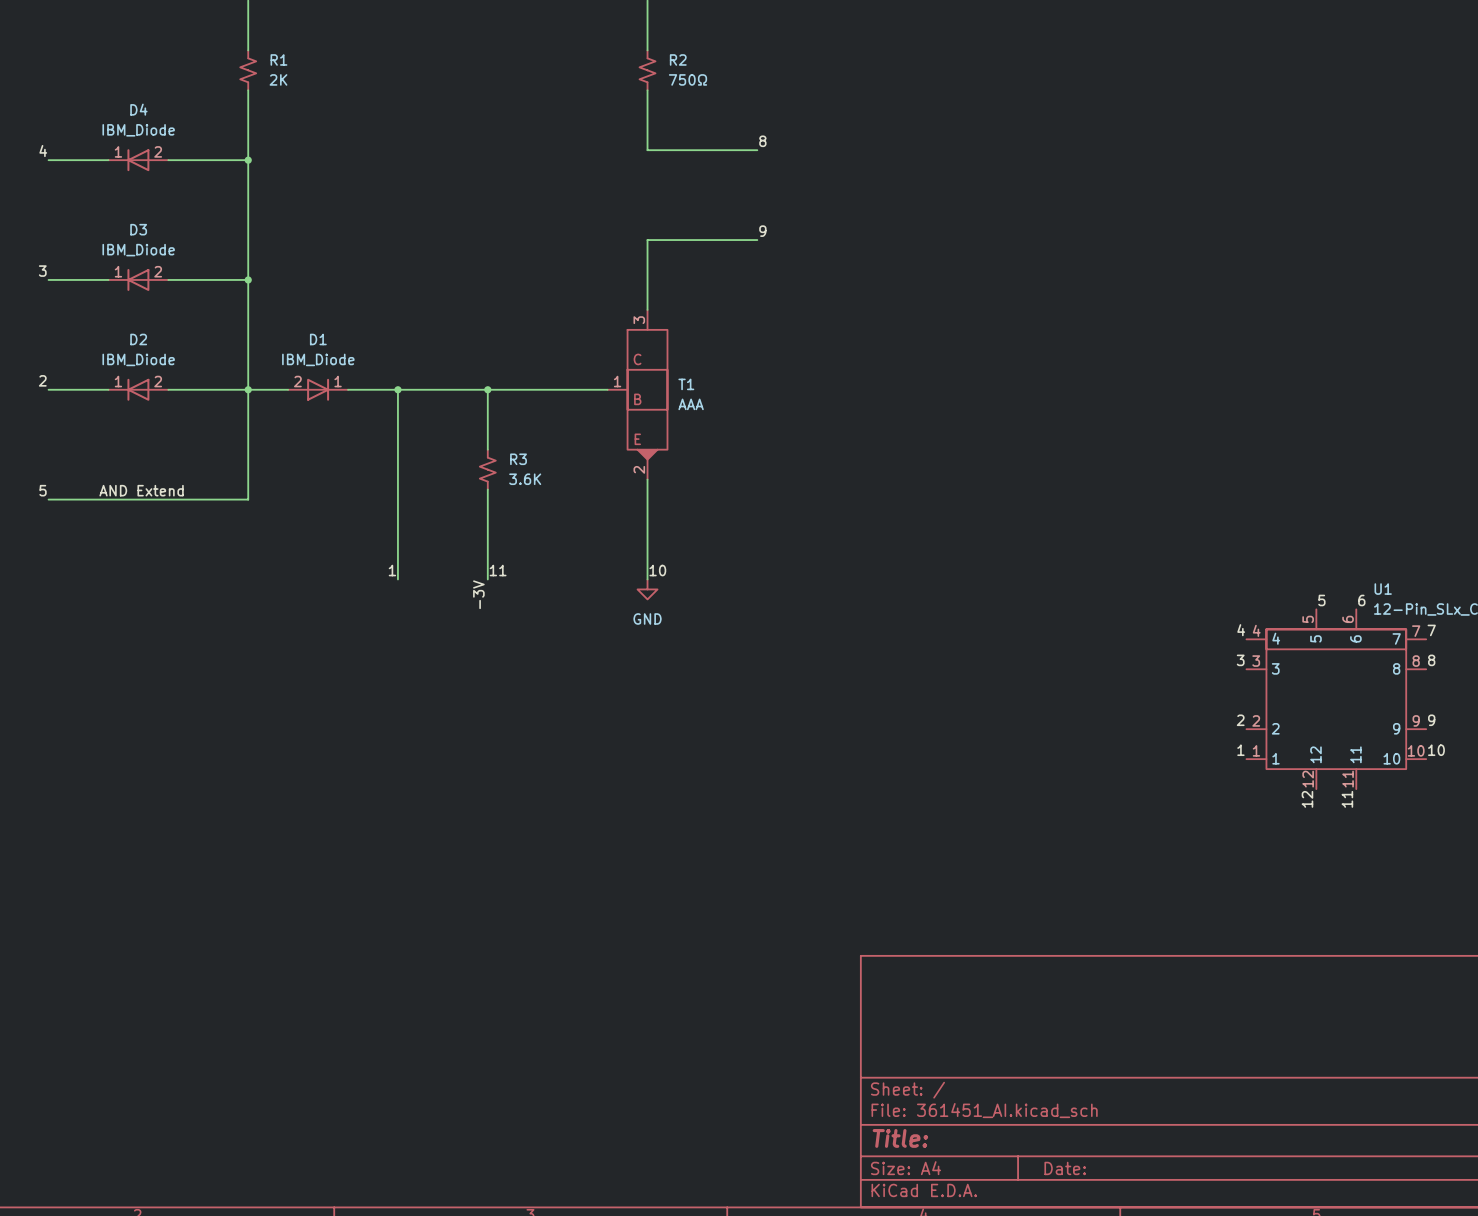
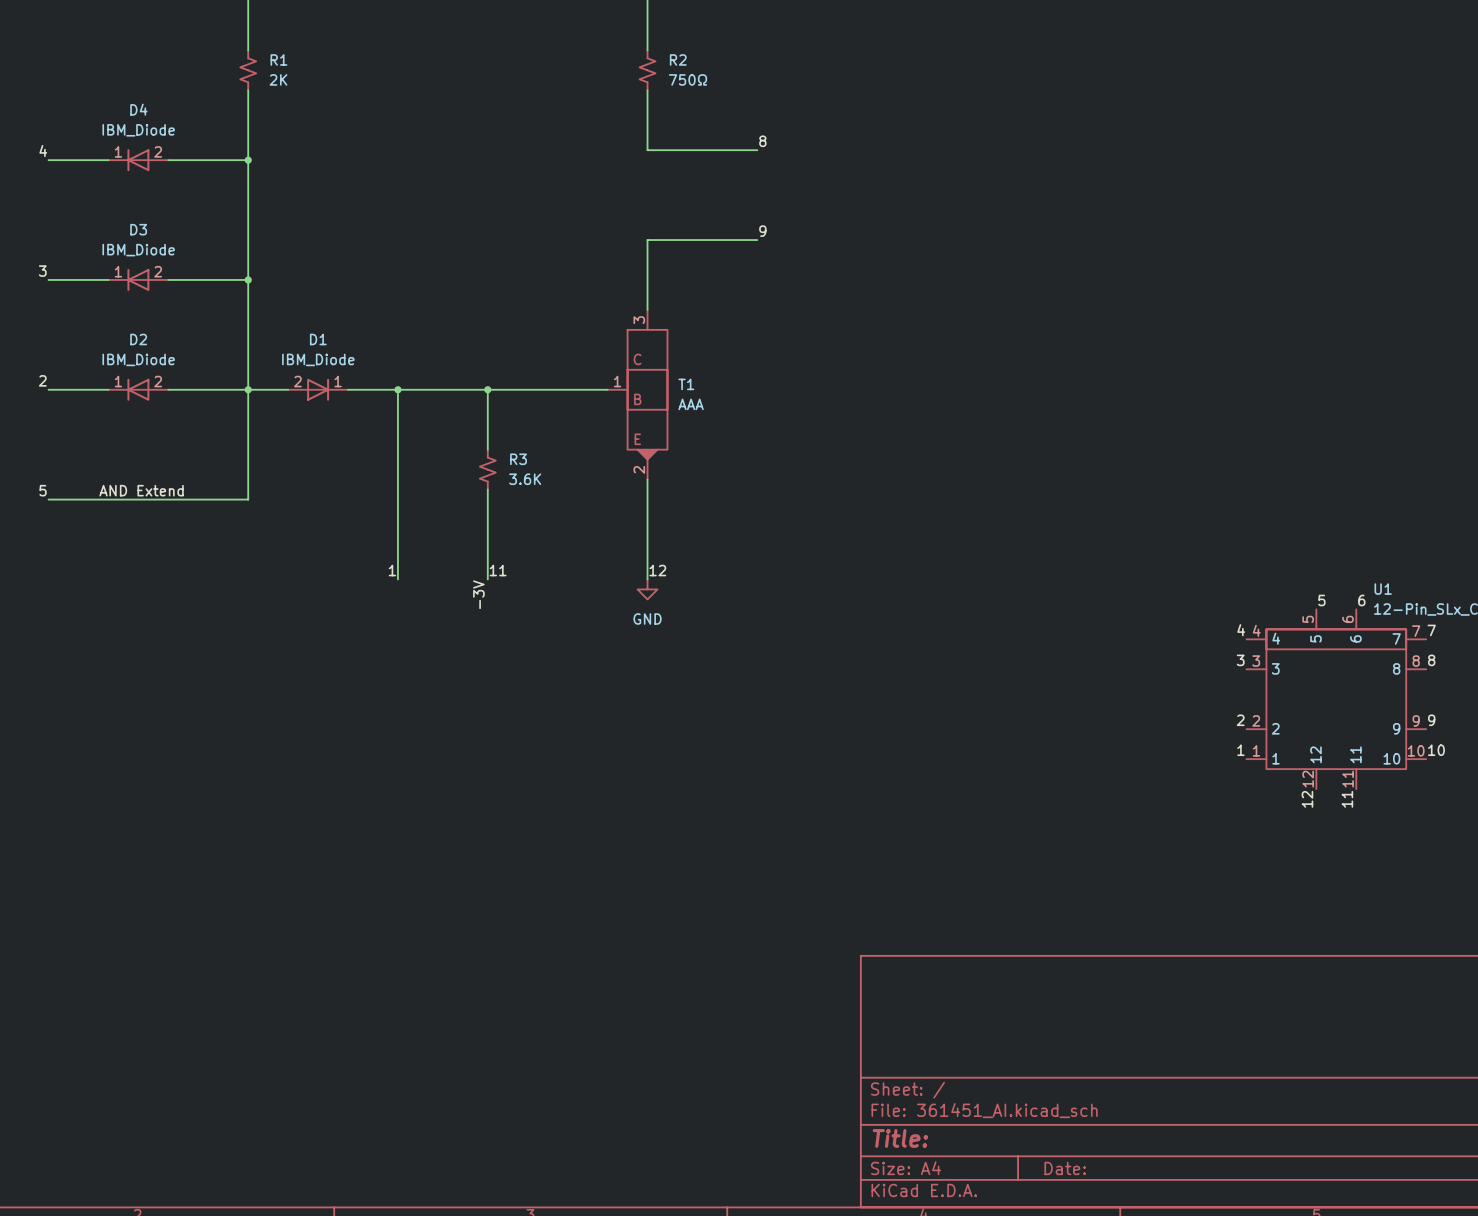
label: 10 (657, 570) -> 12 (657, 570)

